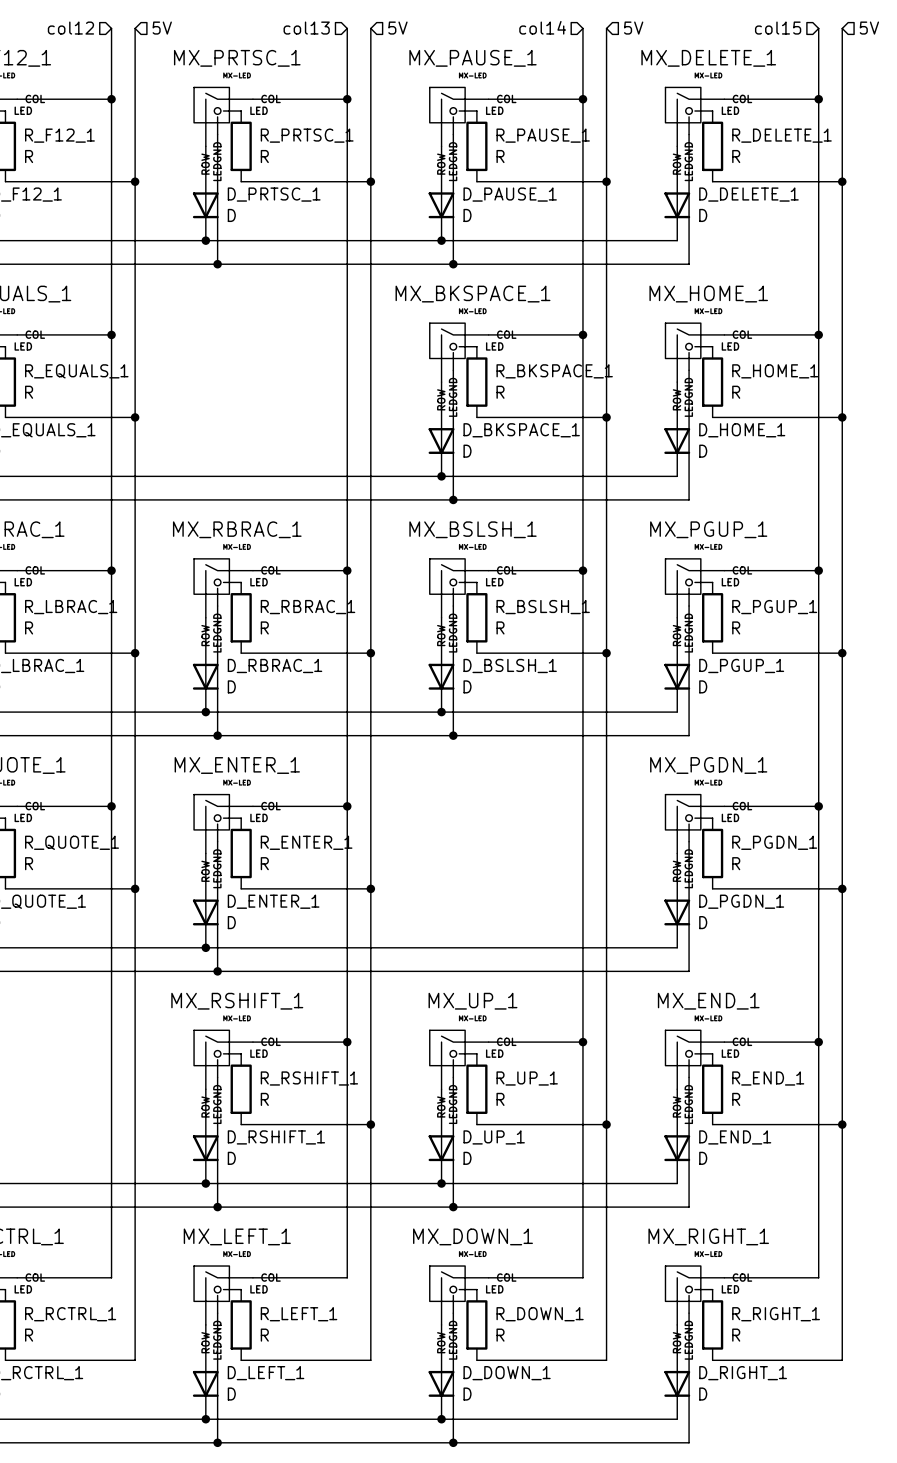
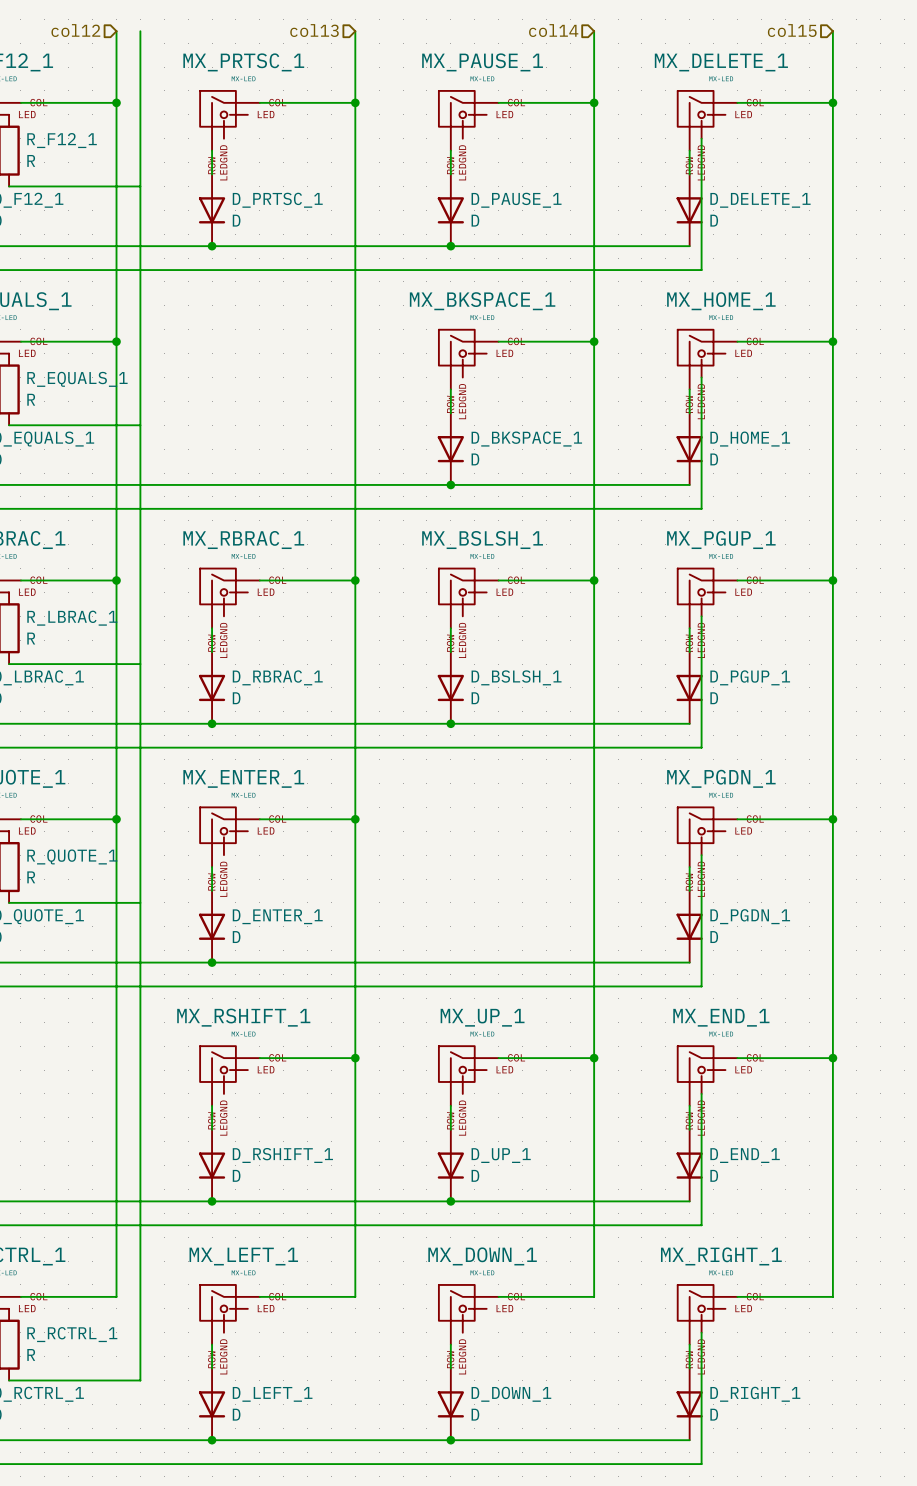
hierarchical label: 5V (162, 28) -> none
wire: (370, 28) (370, 1360) (241, 1360) -> none
hierarchical label: 5V (397, 28) -> none
wire: (606, 28) (606, 1360) (476, 1360) -> none
hierarchical label: 5V (633, 28) -> none
wire: (842, 28) (842, 1360) (712, 1360) -> none
hierarchical label: 5V (869, 28) -> none
wire: (217, 134) (217, 264) -> none
wire: (453, 134) (453, 264) -> none
R_PRTSC_1: R (241, 146) -> none
R_PAUSE_1: R (476, 146) -> none
R_DELETE_1: R (712, 146) -> none
junction: (135, 181) -> none
wire: (241, 181) (370, 181) -> none
junction: (370, 181) -> none
wire: (476, 181) (606, 181) -> none
junction: (606, 181) -> none
wire: (712, 181) (842, 181) -> none
junction: (842, 181) -> none
junction: (217, 264) -> none
junction: (453, 264) -> none
wire: (453, 370) (453, 499) -> none
R_BKSPACE_1: R (476, 382) -> none
R_HOME_1: R (712, 382) -> none
junction: (135, 417) -> none
wire: (476, 417) (606, 417) -> none
junction: (606, 417) -> none
wire: (712, 417) (842, 417) -> none
junction: (842, 417) -> none
junction: (453, 499) -> none
wire: (217, 606) (217, 735) -> none
wire: (453, 606) (453, 735) -> none
R_RBRAC_1: R (241, 617) -> none
R_BSLSH_1: R (476, 617) -> none
R_PGUP_1: R (712, 617) -> none
junction: (135, 653) -> none
wire: (241, 653) (370, 653) -> none
junction: (370, 653) -> none
wire: (476, 653) (606, 653) -> none
junction: (606, 653) -> none
wire: (712, 653) (842, 653) -> none
junction: (842, 653) -> none
junction: (217, 735) -> none
junction: (453, 735) -> none
wire: (217, 841) (217, 971) -> none
R_ENTER_1: R (241, 853) -> none
R_PGDN_1: R (712, 853) -> none
junction: (135, 888) -> none
wire: (241, 888) (370, 888) -> none
junction: (370, 888) -> none
wire: (712, 888) (842, 888) -> none
junction: (842, 888) -> none
junction: (217, 971) -> none
wire: (217, 1077) (217, 1207) -> none
wire: (453, 1077) (453, 1207) -> none
R_RSHIFT_1: R (241, 1089) -> none
R_UP_1: R (476, 1089) -> none
R_END_1: R (712, 1089) -> none
wire: (241, 1124) (370, 1124) -> none
junction: (370, 1124) -> none
wire: (476, 1124) (606, 1124) -> none
junction: (606, 1124) -> none
wire: (712, 1124) (842, 1124) -> none
junction: (842, 1124) -> none
junction: (217, 1207) -> none
junction: (453, 1207) -> none
wire: (217, 1313) (217, 1442) -> none
wire: (453, 1313) (453, 1442) -> none
R_LEFT_1: R (241, 1324) -> none
R_DOWN_1: R (476, 1324) -> none
R_RIGHT_1: R (712, 1324) -> none
junction: (217, 1442) -> none
junction: (453, 1442) -> none

